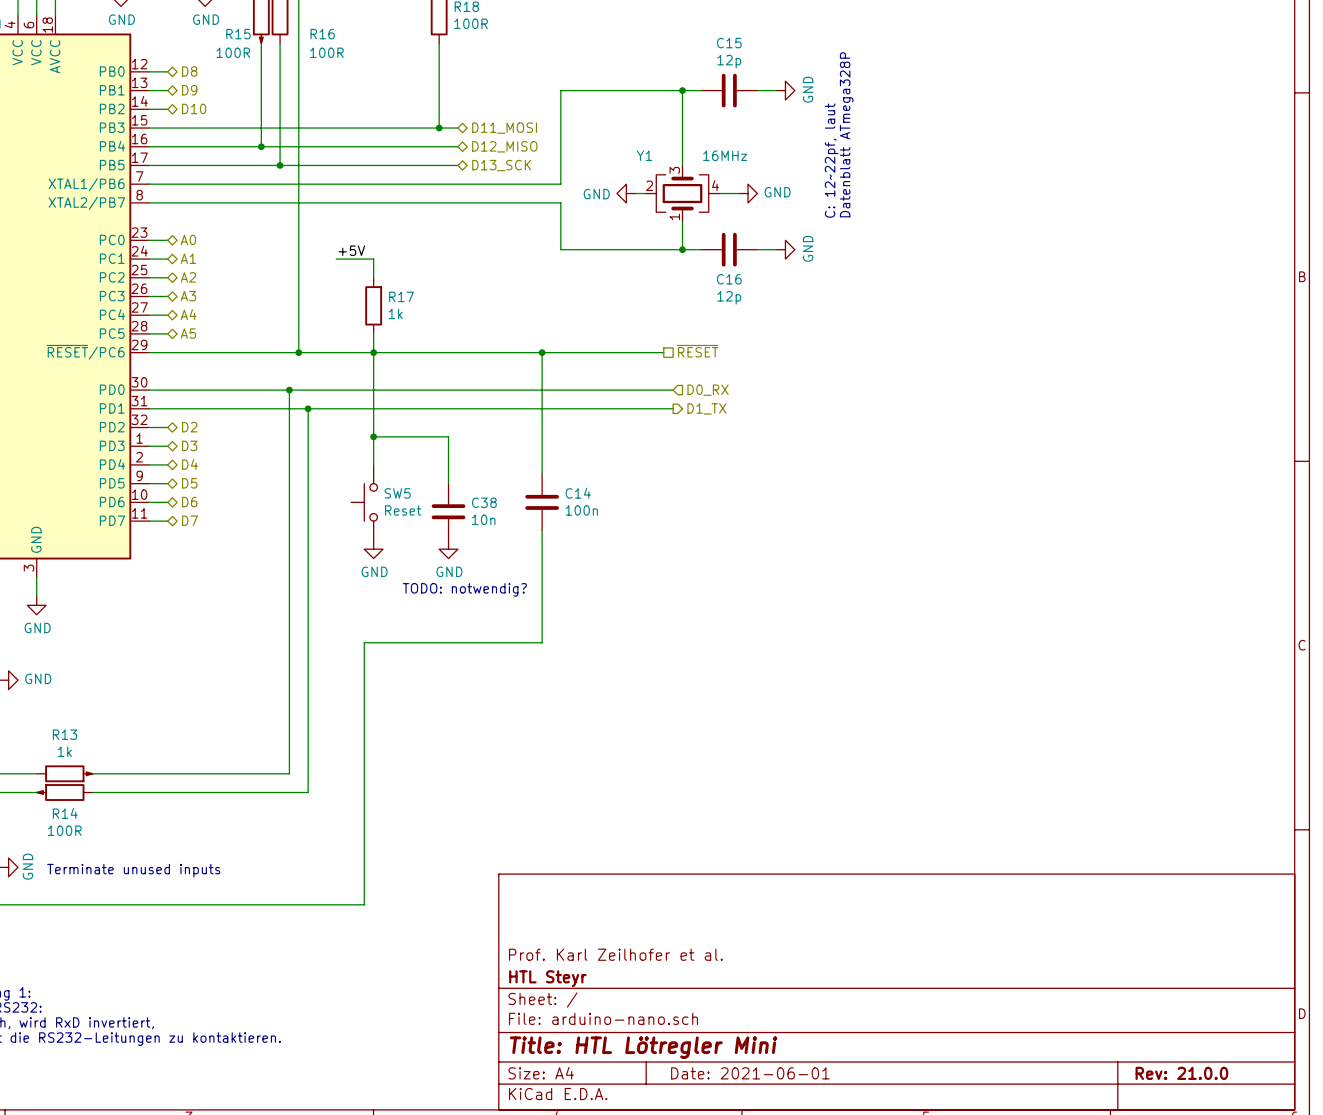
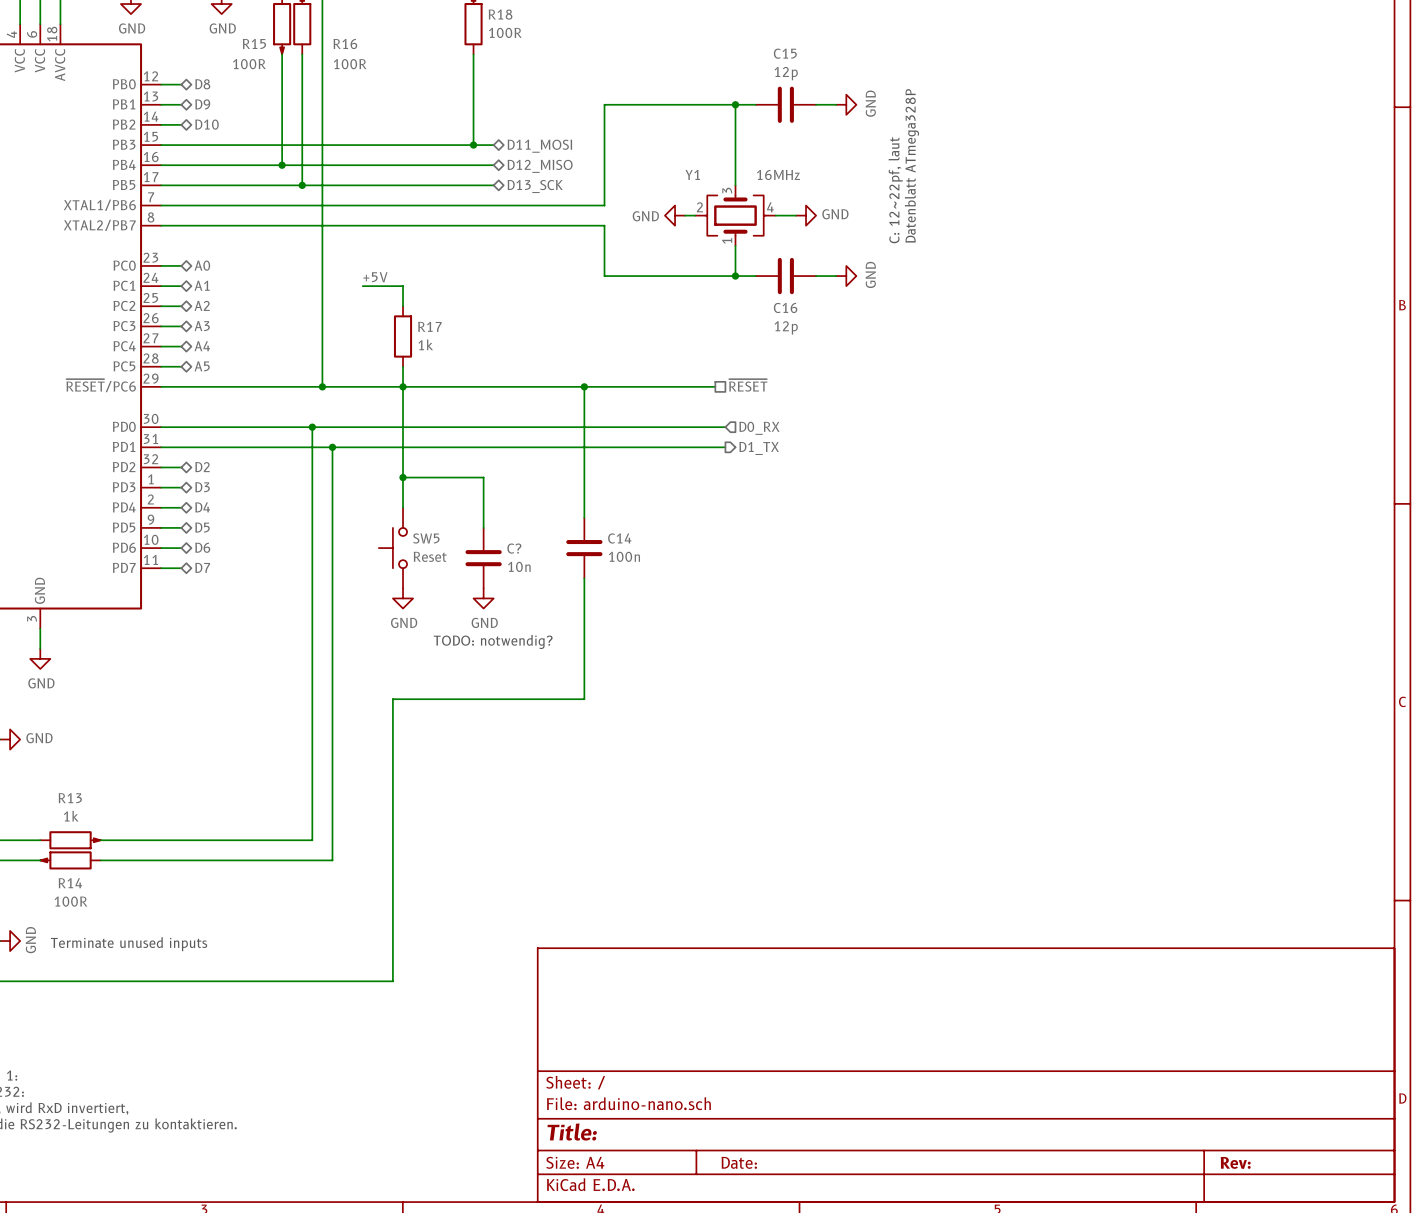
C38 name: C38 (484, 502) -> C? (514, 548)
title block: Prof. Karl Zeilhofer et al. (615, 954) -> none
title block: HTL Steyr (547, 978) -> none
title block: Title: HTL Lötregler Mini (643, 1047) -> Title: (572, 1132)
title block: Date: 2021-06-01 (750, 1073) -> Date: (739, 1162)
title block: Rev: 21.0.0 (1181, 1073) -> Rev: (1235, 1162)

